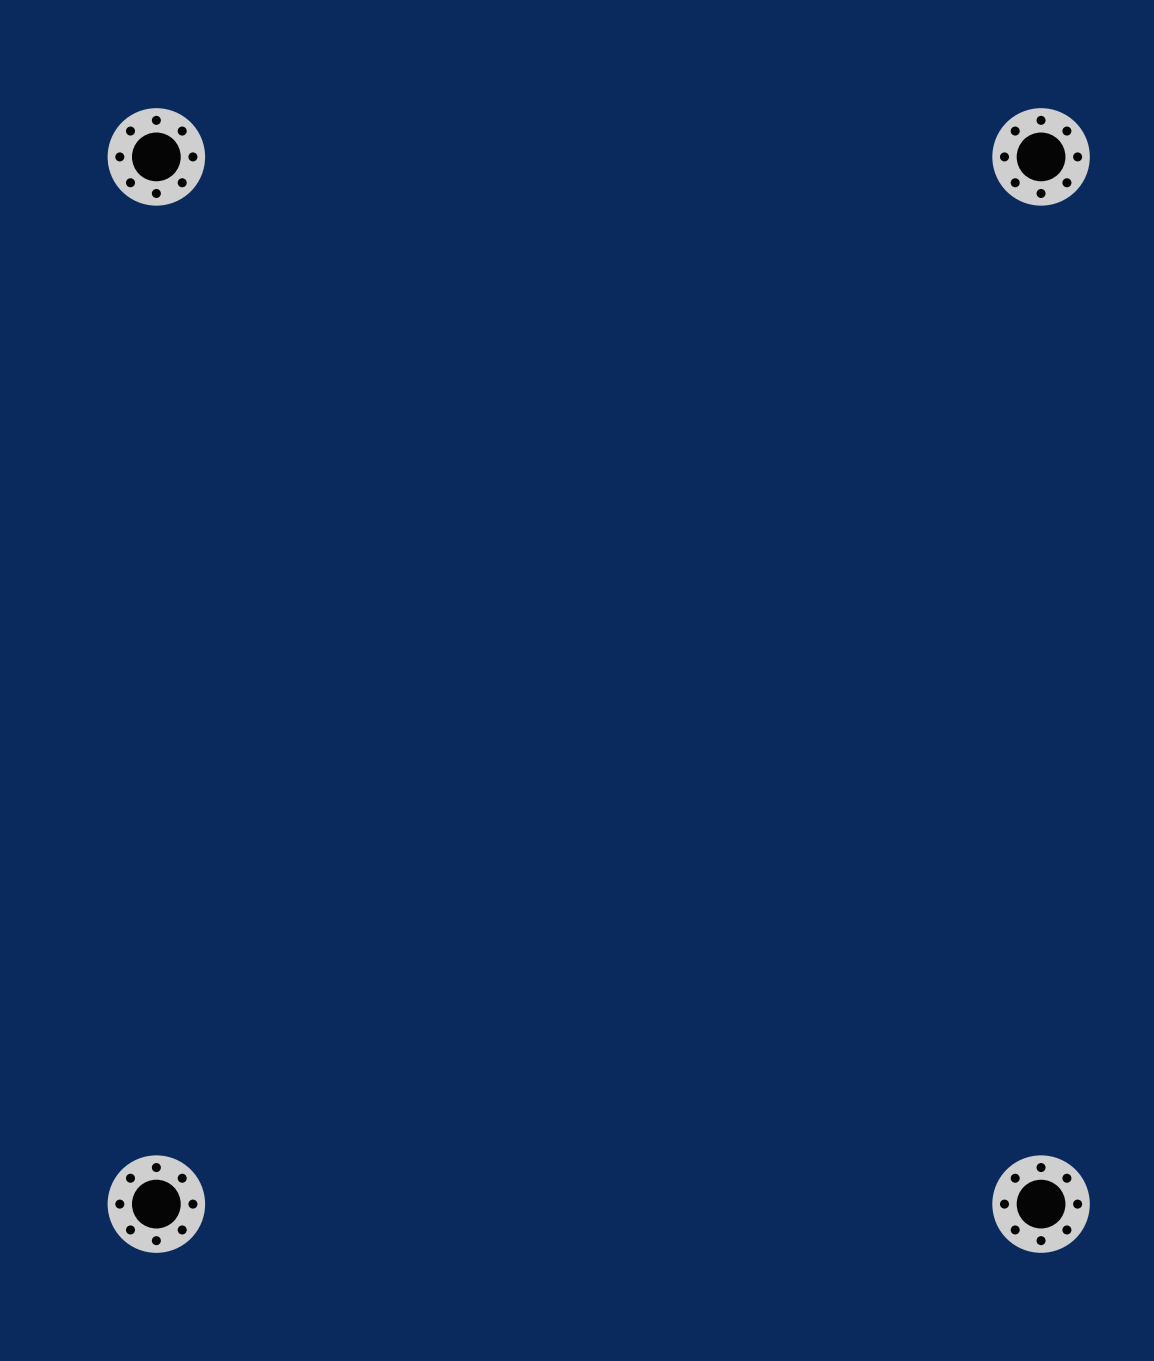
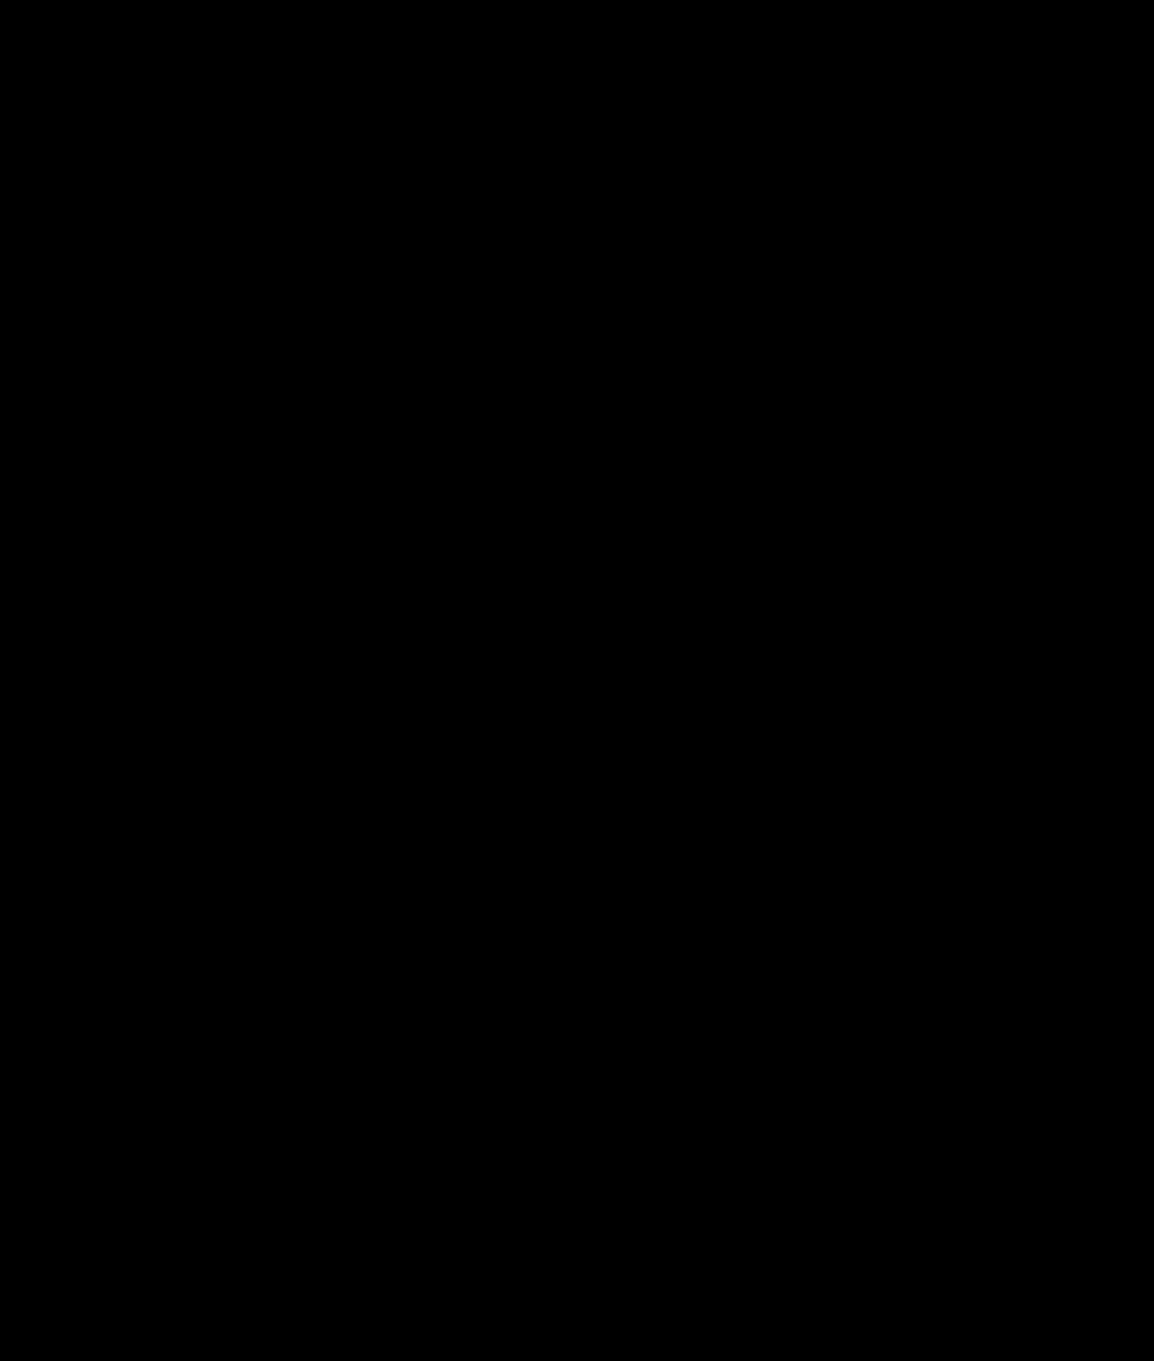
part: (156, 156) -> none
part: (1041, 156) -> none
part: (156, 1204) -> none
part: (1041, 1204) -> none

